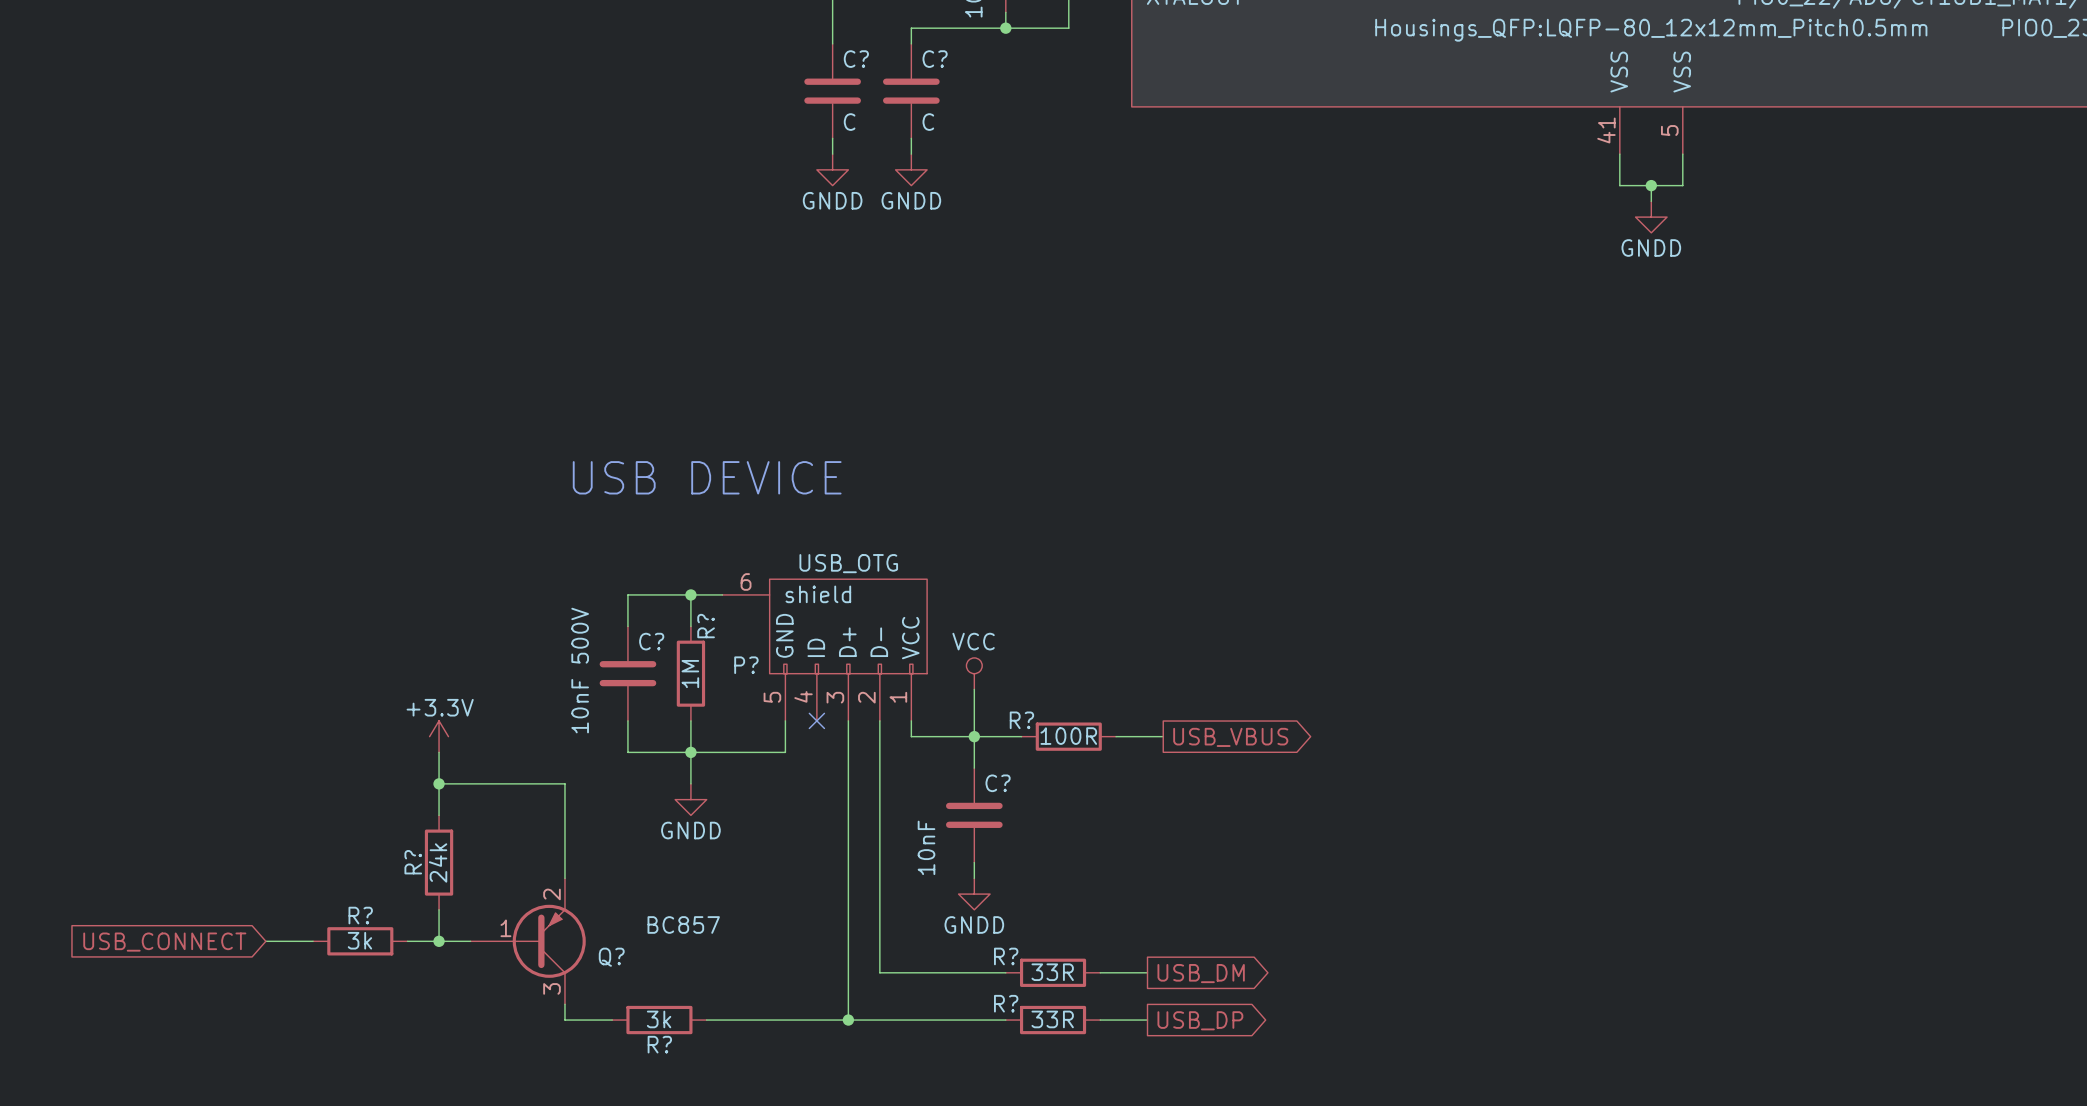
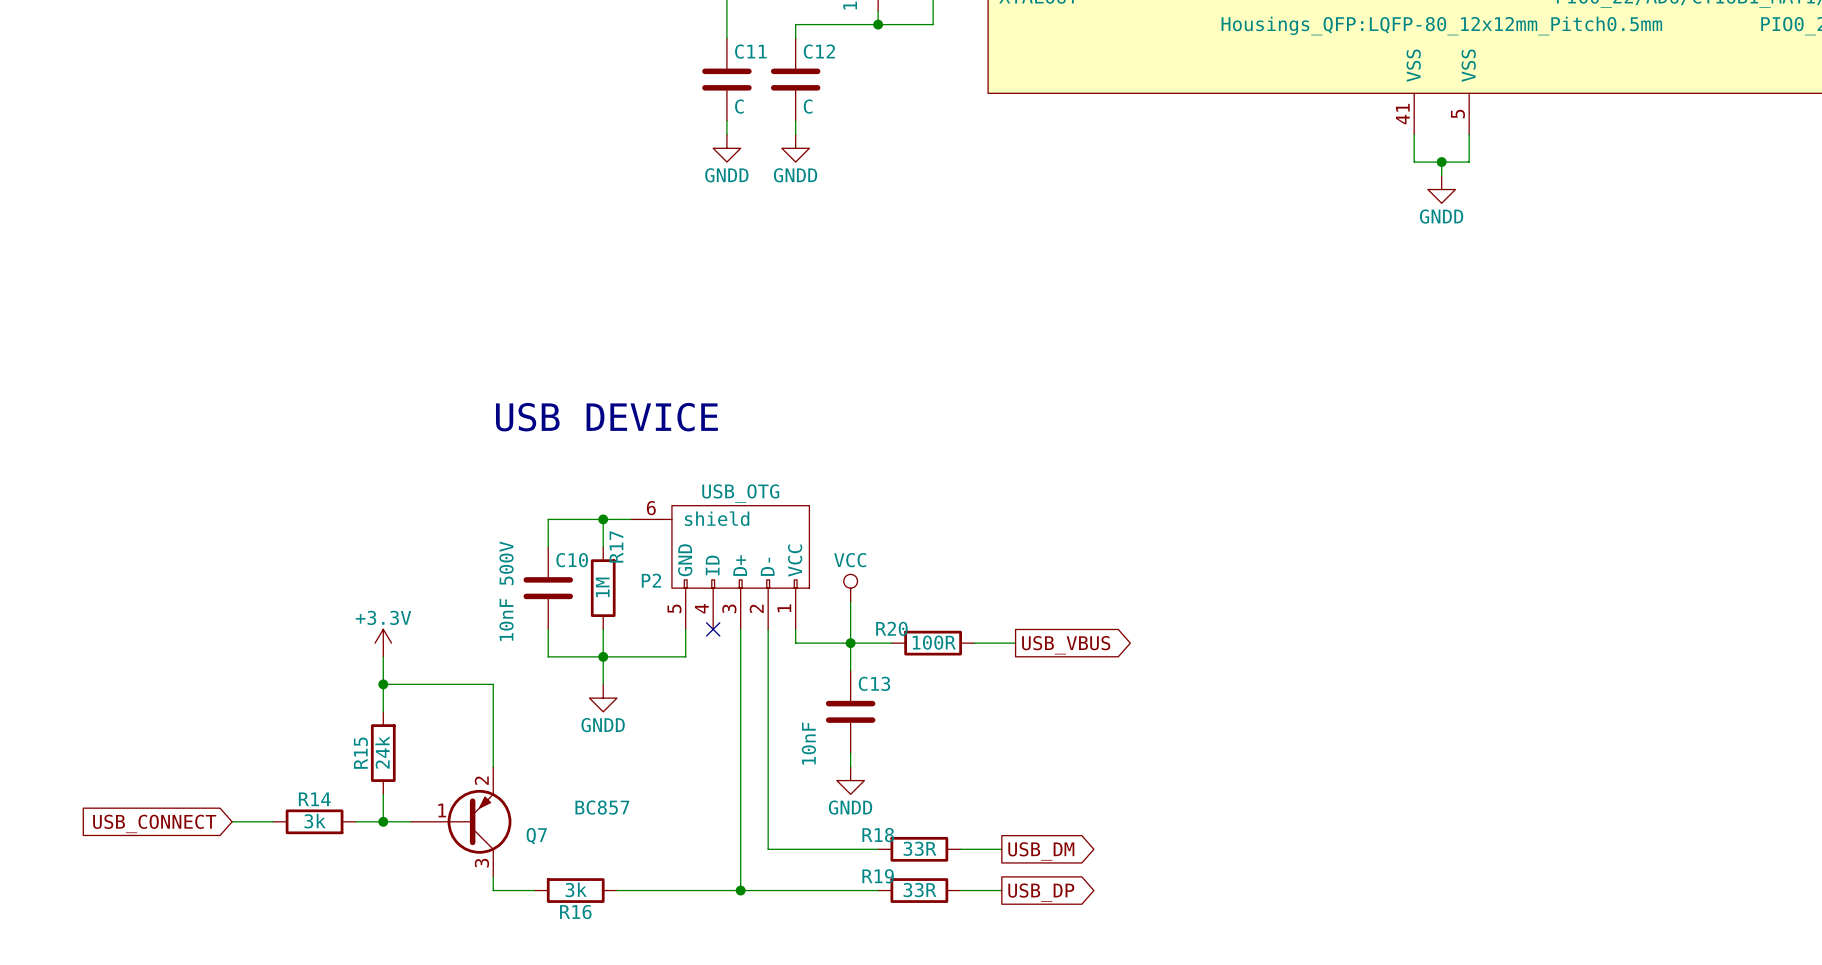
C? name: C? (856, 59) -> C11 (750, 51)
C? name: C? (935, 59) -> C12 (819, 51)
R? name: R? (706, 626) -> R17 (616, 546)
C? name: C? (651, 641) -> C10 (572, 560)
P? name: P? (746, 665) -> P2 (651, 580)
R? name: R? (1021, 720) -> R20 (891, 628)
C? name: C? (998, 783) -> C13 (874, 683)
R? name: R? (413, 862) -> R15 (360, 753)
R? name: R? (360, 915) -> R14 (314, 799)
R? name: R? (1006, 956) -> R18 (878, 835)
Q? name: Q? (611, 957) -> Q7 (536, 836)
R? name: R? (1006, 1003) -> R19 (878, 876)
R? name: R? (659, 1044) -> R16 (575, 912)

